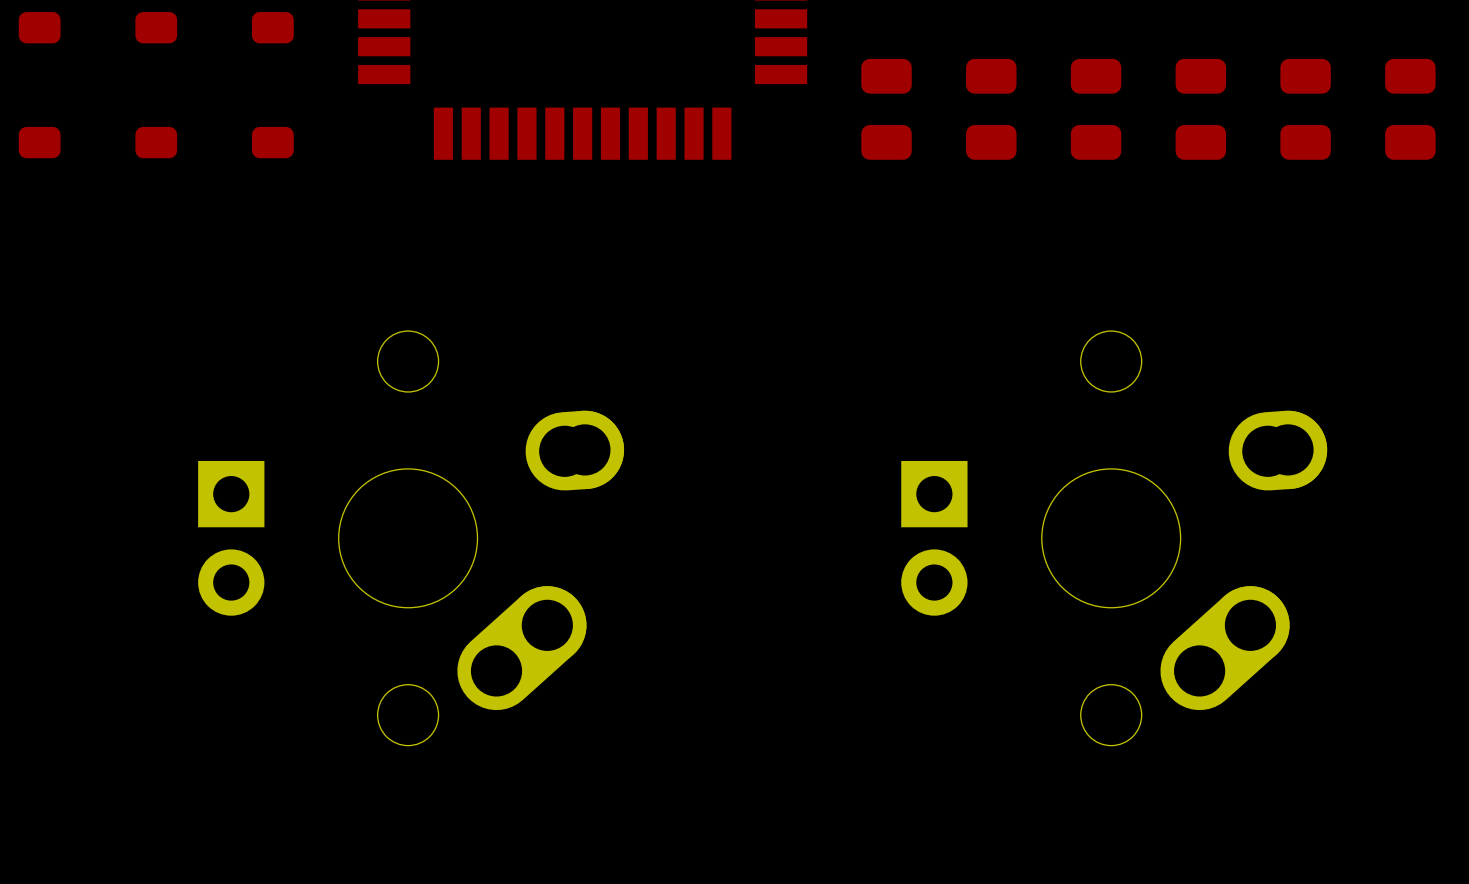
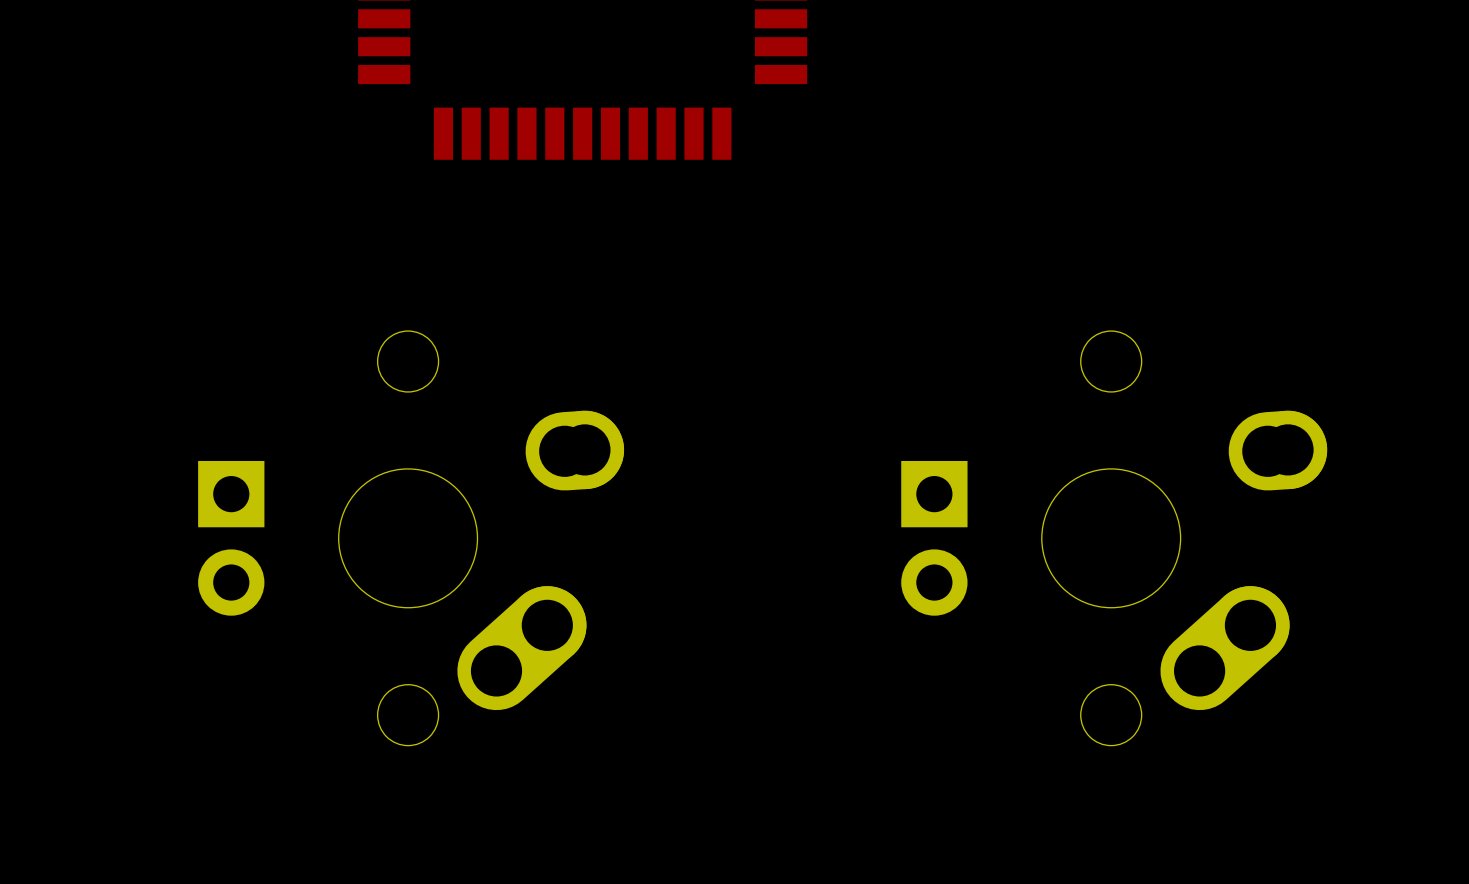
part: (39, 85) -> none
part: (156, 85) -> none
part: (272, 85) -> none
part: (886, 109) -> none
part: (991, 109) -> none
part: (1096, 109) -> none
part: (1200, 109) -> none
part: (1305, 109) -> none
part: (1410, 109) -> none

